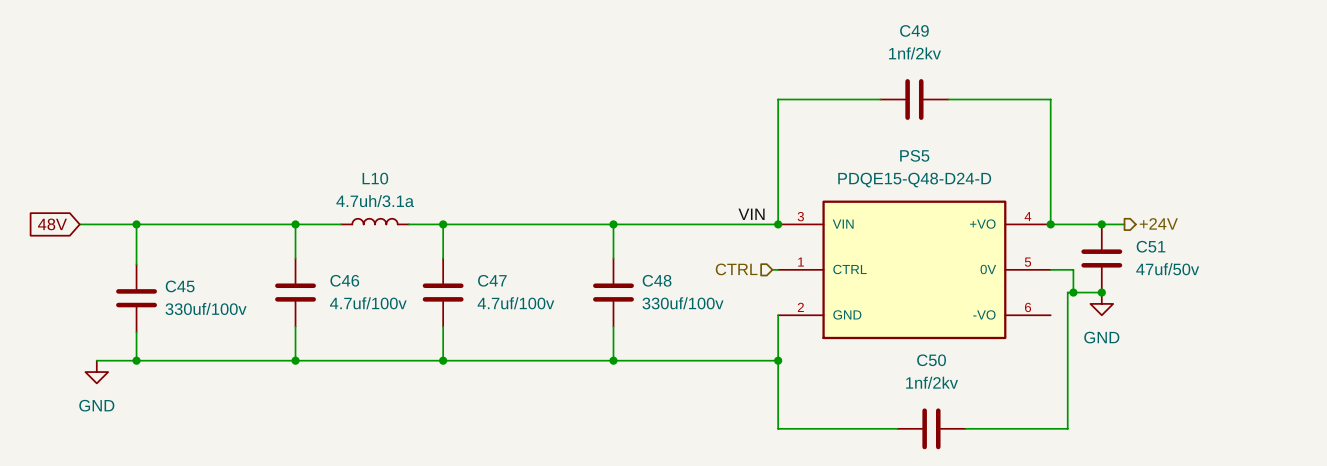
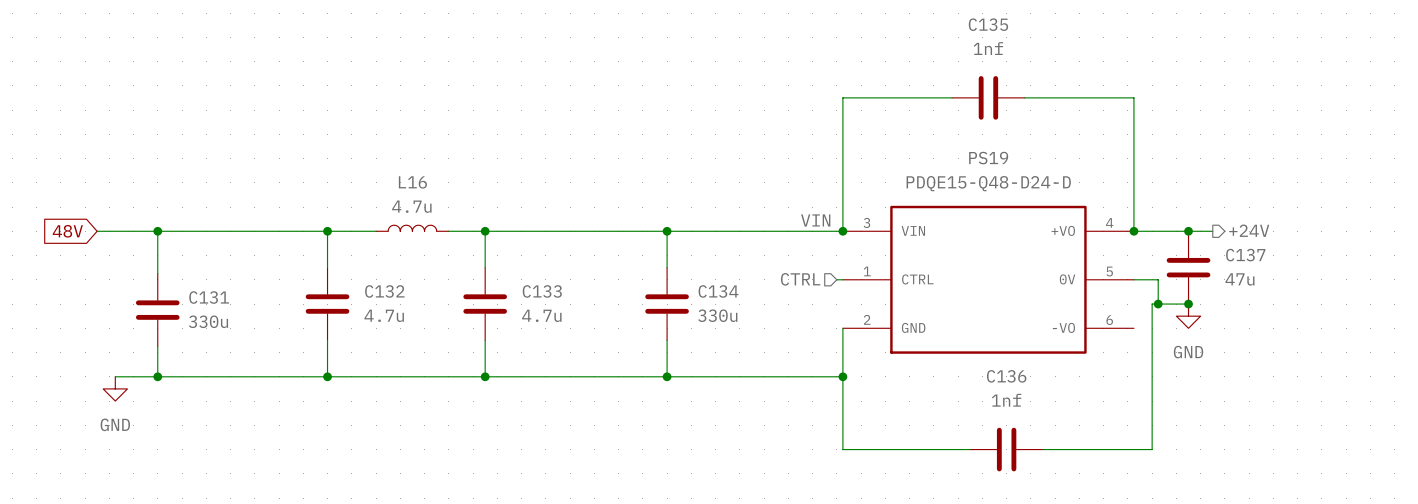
C49 name: C49 (914, 30) -> C135 (988, 24)
C49 value: 1nf/2kv (915, 53) -> 1nf (988, 48)
PS5 name: PS5 (914, 155) -> PS19 (988, 158)
L10 name: L10 (375, 178) -> L16 (412, 182)
L10 value: 4.7uh/3.1a (375, 201) -> 4.7u (411, 206)
C51 name: C51 (1151, 246) -> C137 (1245, 255)
C51 value: 47uf/50v (1167, 269) -> 47u (1239, 279)
C46 name: C46 (344, 280) -> C132 (384, 291)
C47 name: C47 (492, 280) -> C133 (542, 291)
C48 name: C48 (657, 280) -> C134 (718, 291)
C45 name: C45 (180, 286) -> C131 (209, 297)
C46 value: 4.7uf/100v (368, 303) -> 4.7u (384, 315)
C47 value: 4.7uf/100v (515, 303) -> 4.7u (541, 315)
C48 value: 330uf/100v (683, 303) -> 330u (717, 315)
C45 value: 330uf/100v (206, 308) -> 330u (208, 321)
C50 name: C50 (931, 360) -> C136 (1006, 376)
C50 value: 1nf/2kv (932, 382) -> 1nf (1006, 400)

